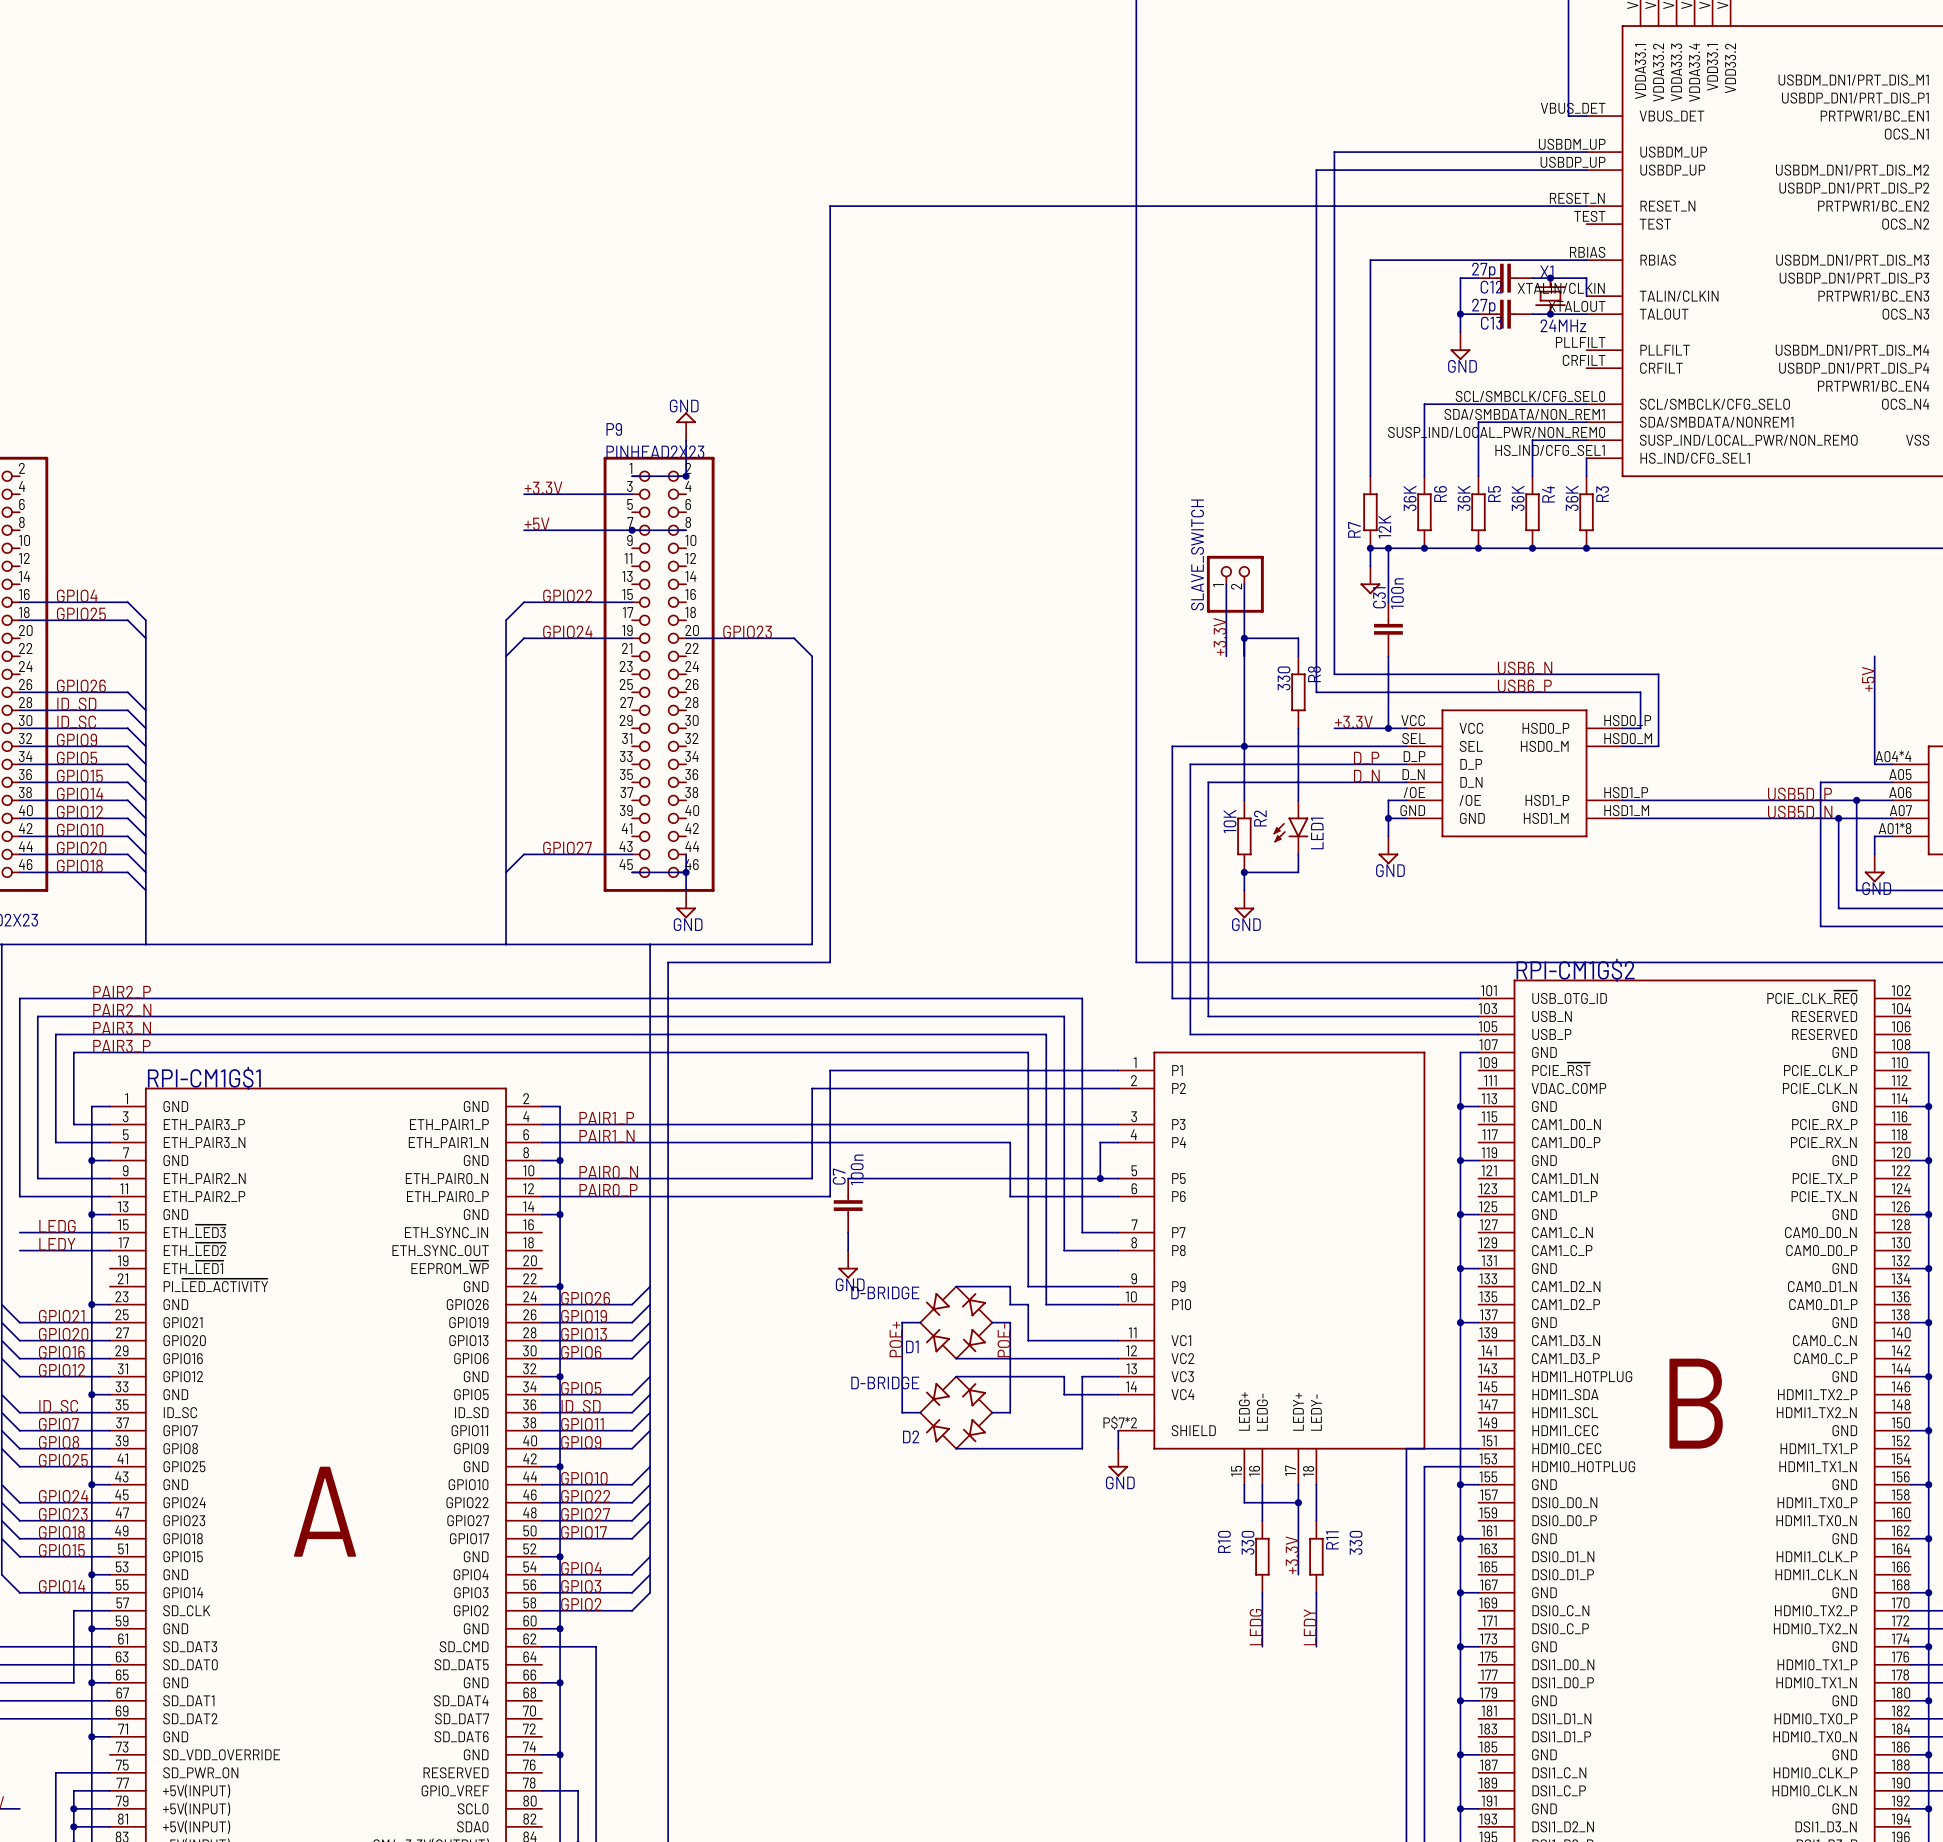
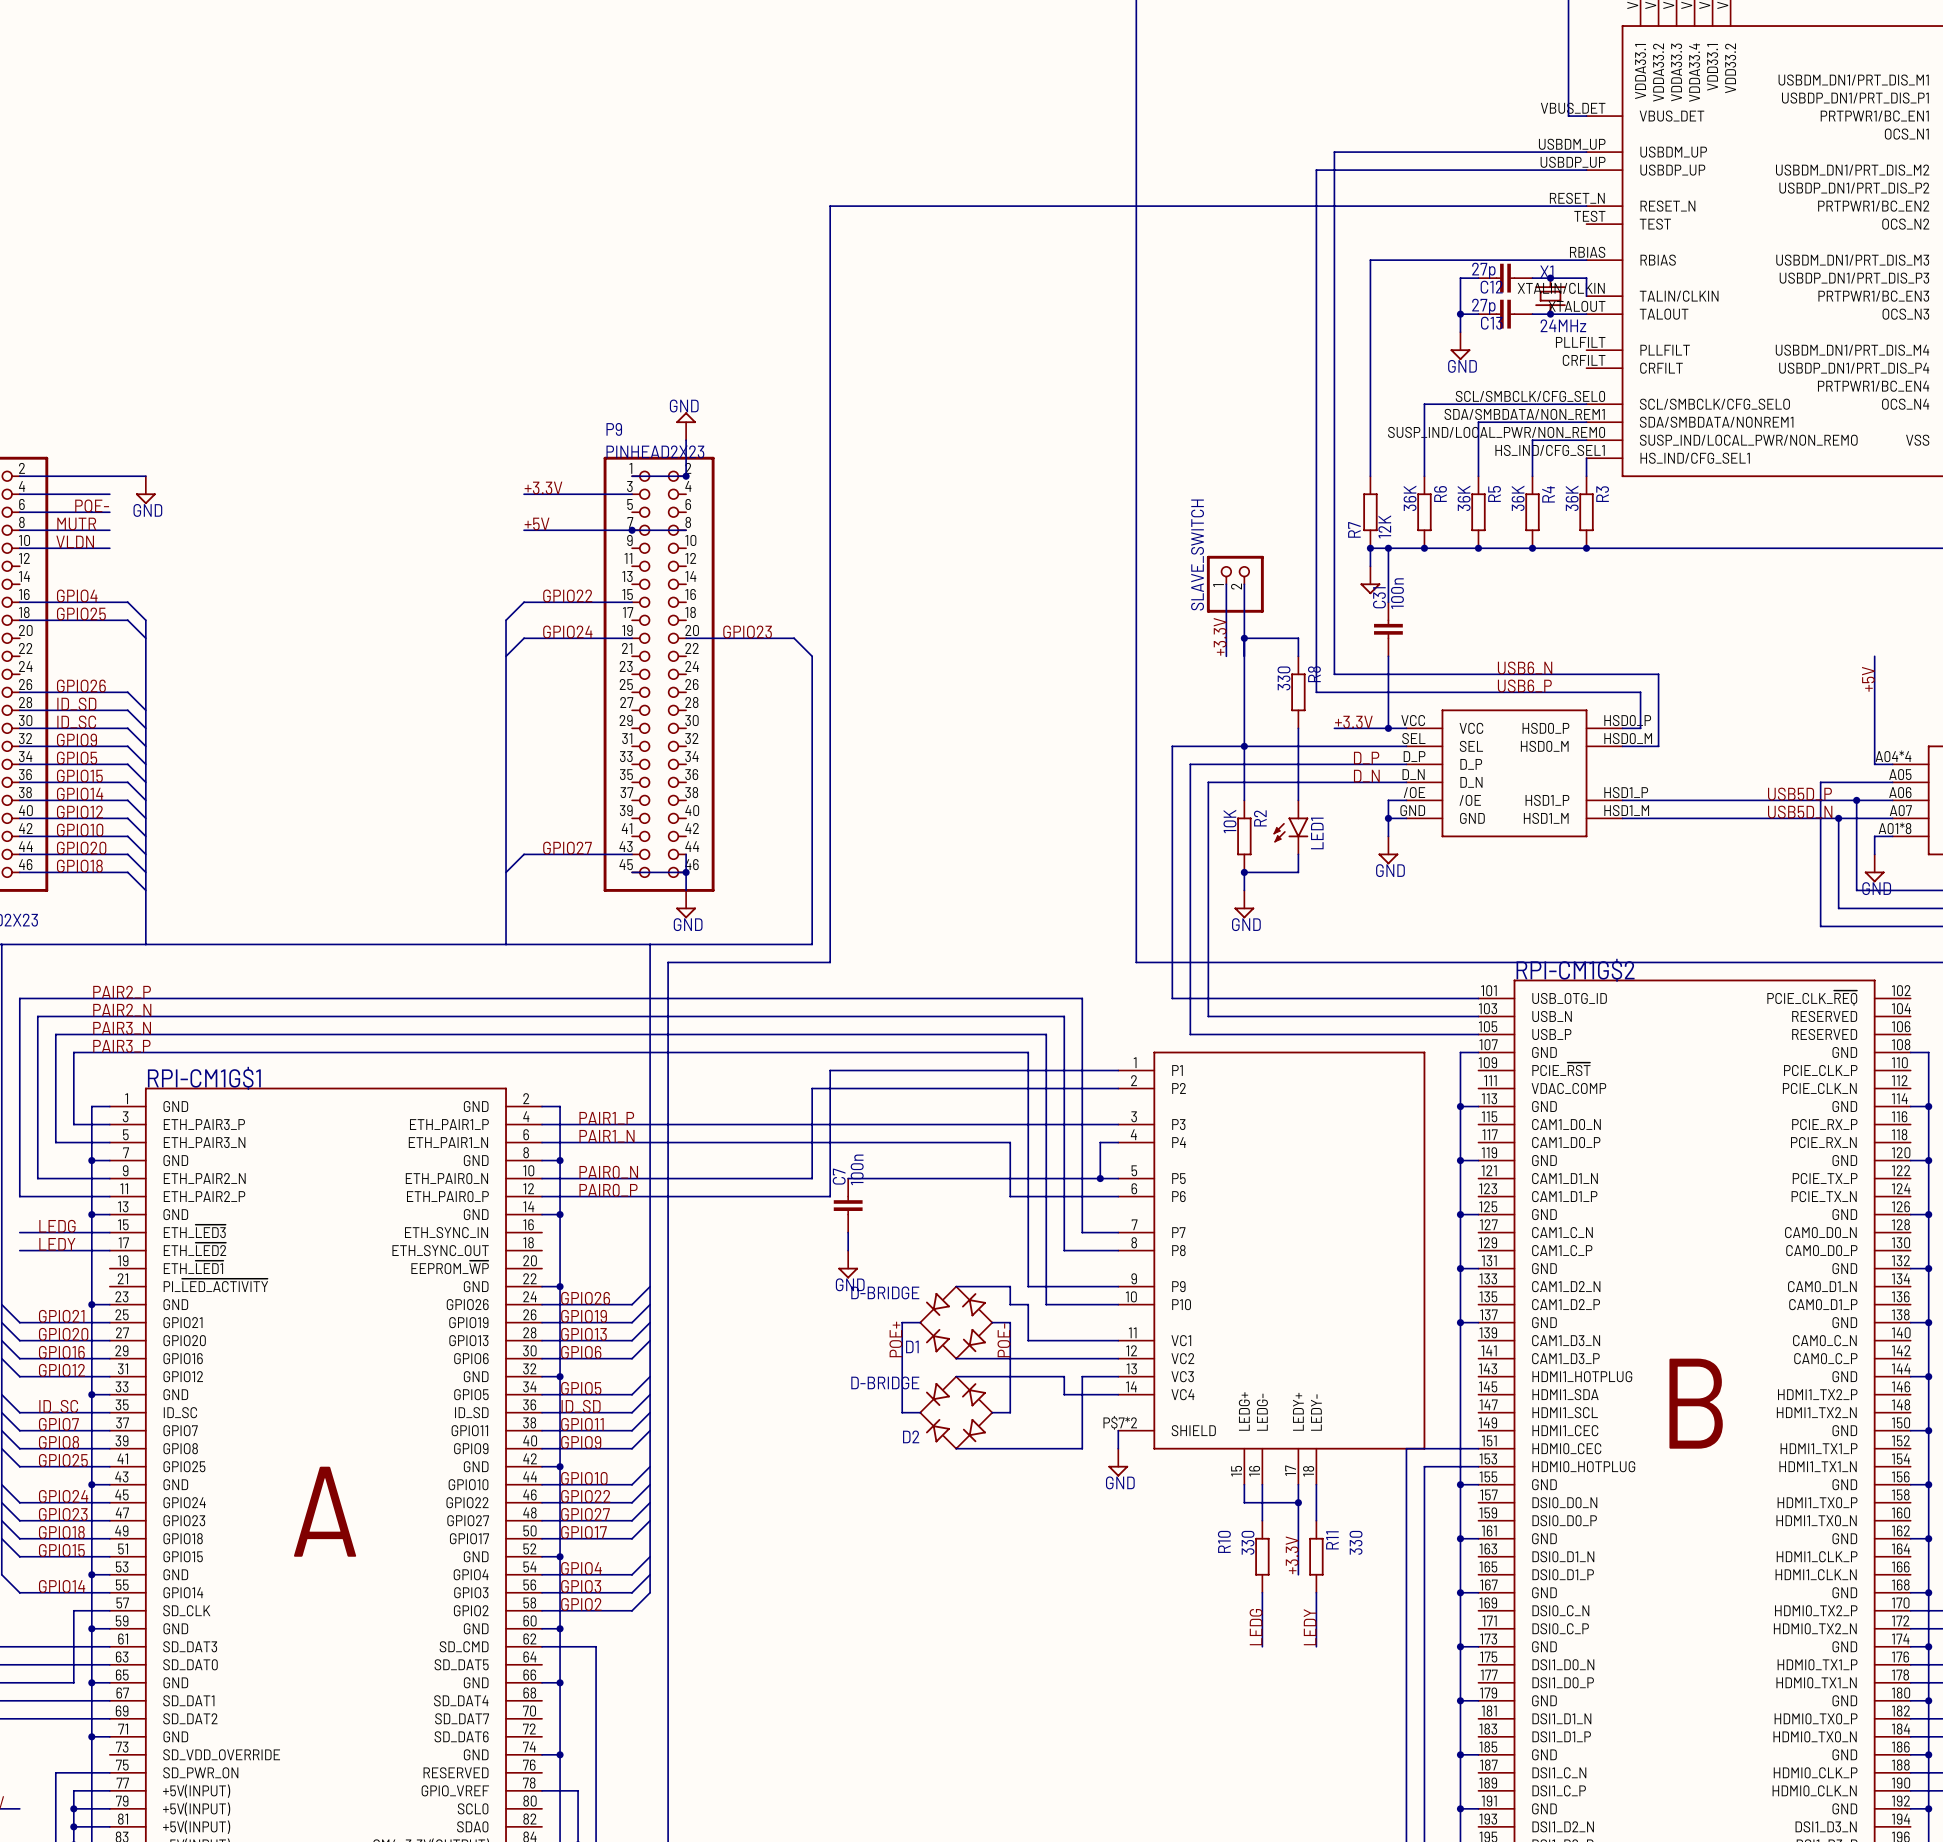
wire: none -> (19, 476) (145, 476)
power symbol: none -> GND (145, 490)
wire: none -> (19, 494) (109, 494)
label: none -> POE- (92, 505)
wire: none -> (19, 512) (109, 512)
label: none -> MUTR (76, 524)
wire: none -> (19, 530) (109, 530)
label: none -> VLDN (75, 541)
wire: none -> (19, 548) (109, 548)

